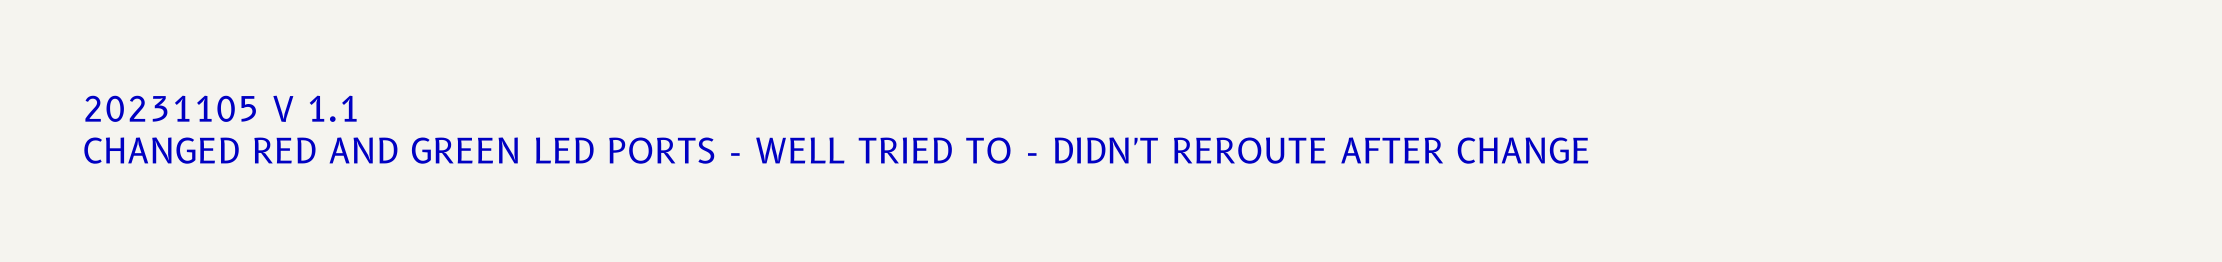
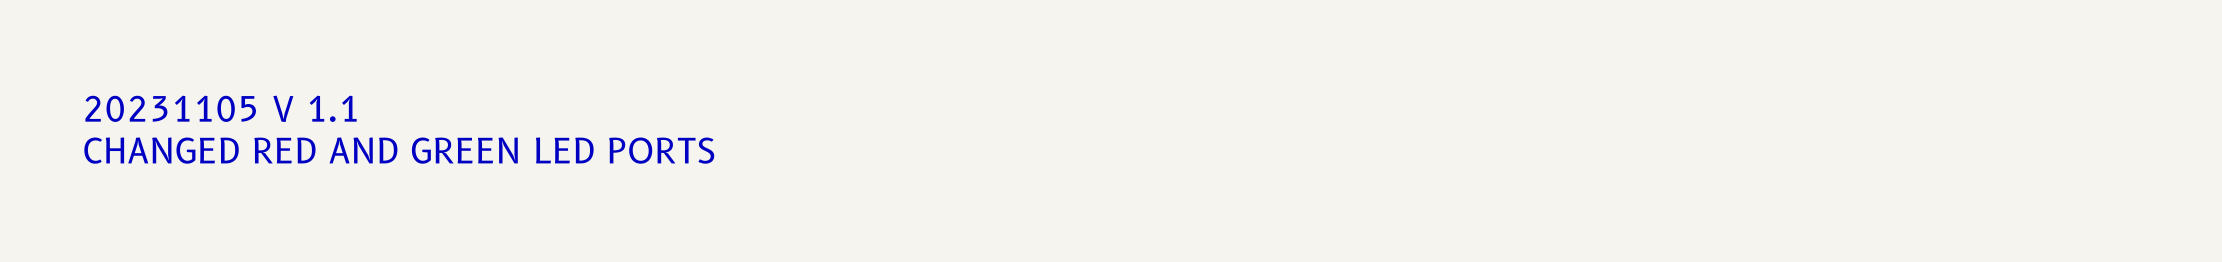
text: CHANGED RED AND GREEN LED PORTS - WELL TRIED TO - DIDN'T REROUTE AFTER CHANGE (836, 150) -> CHANGED RED AND GREEN LED PORTS (399, 150)

